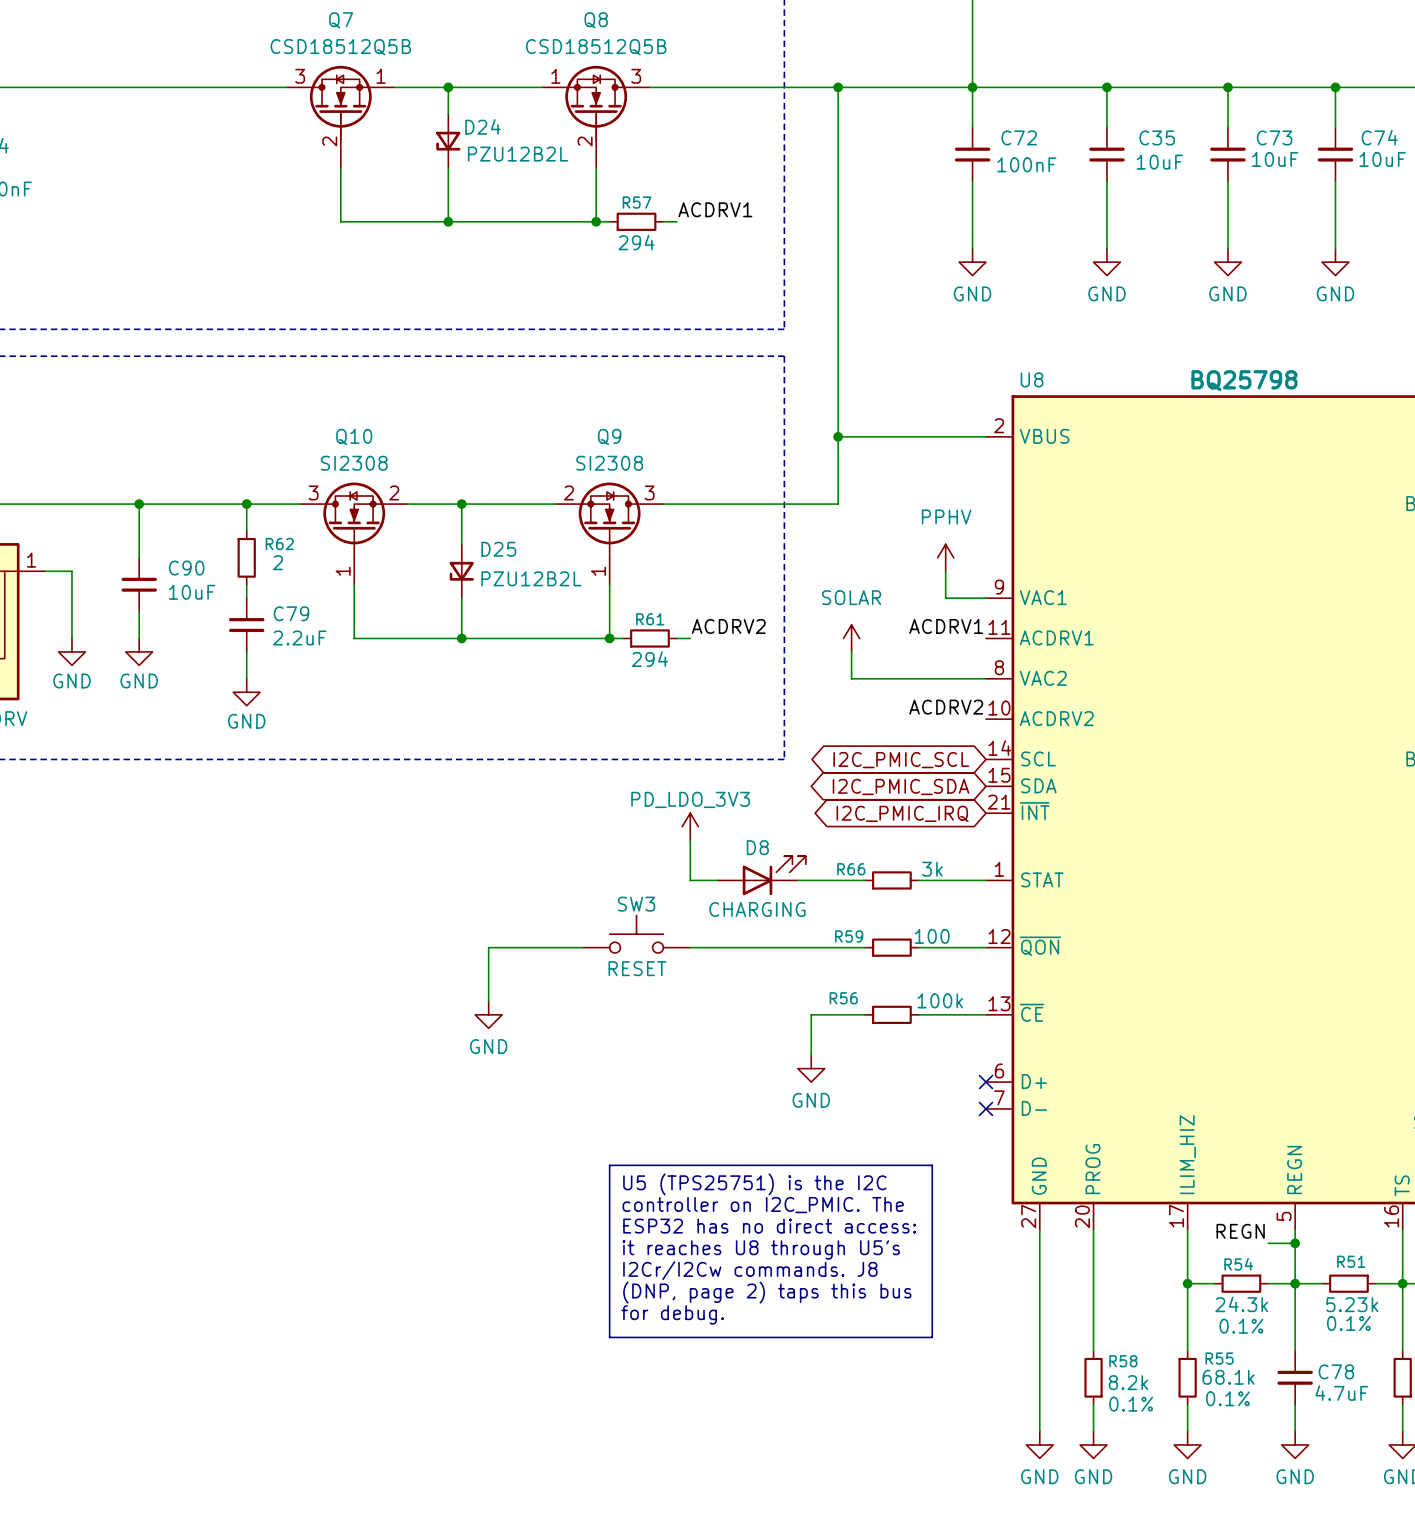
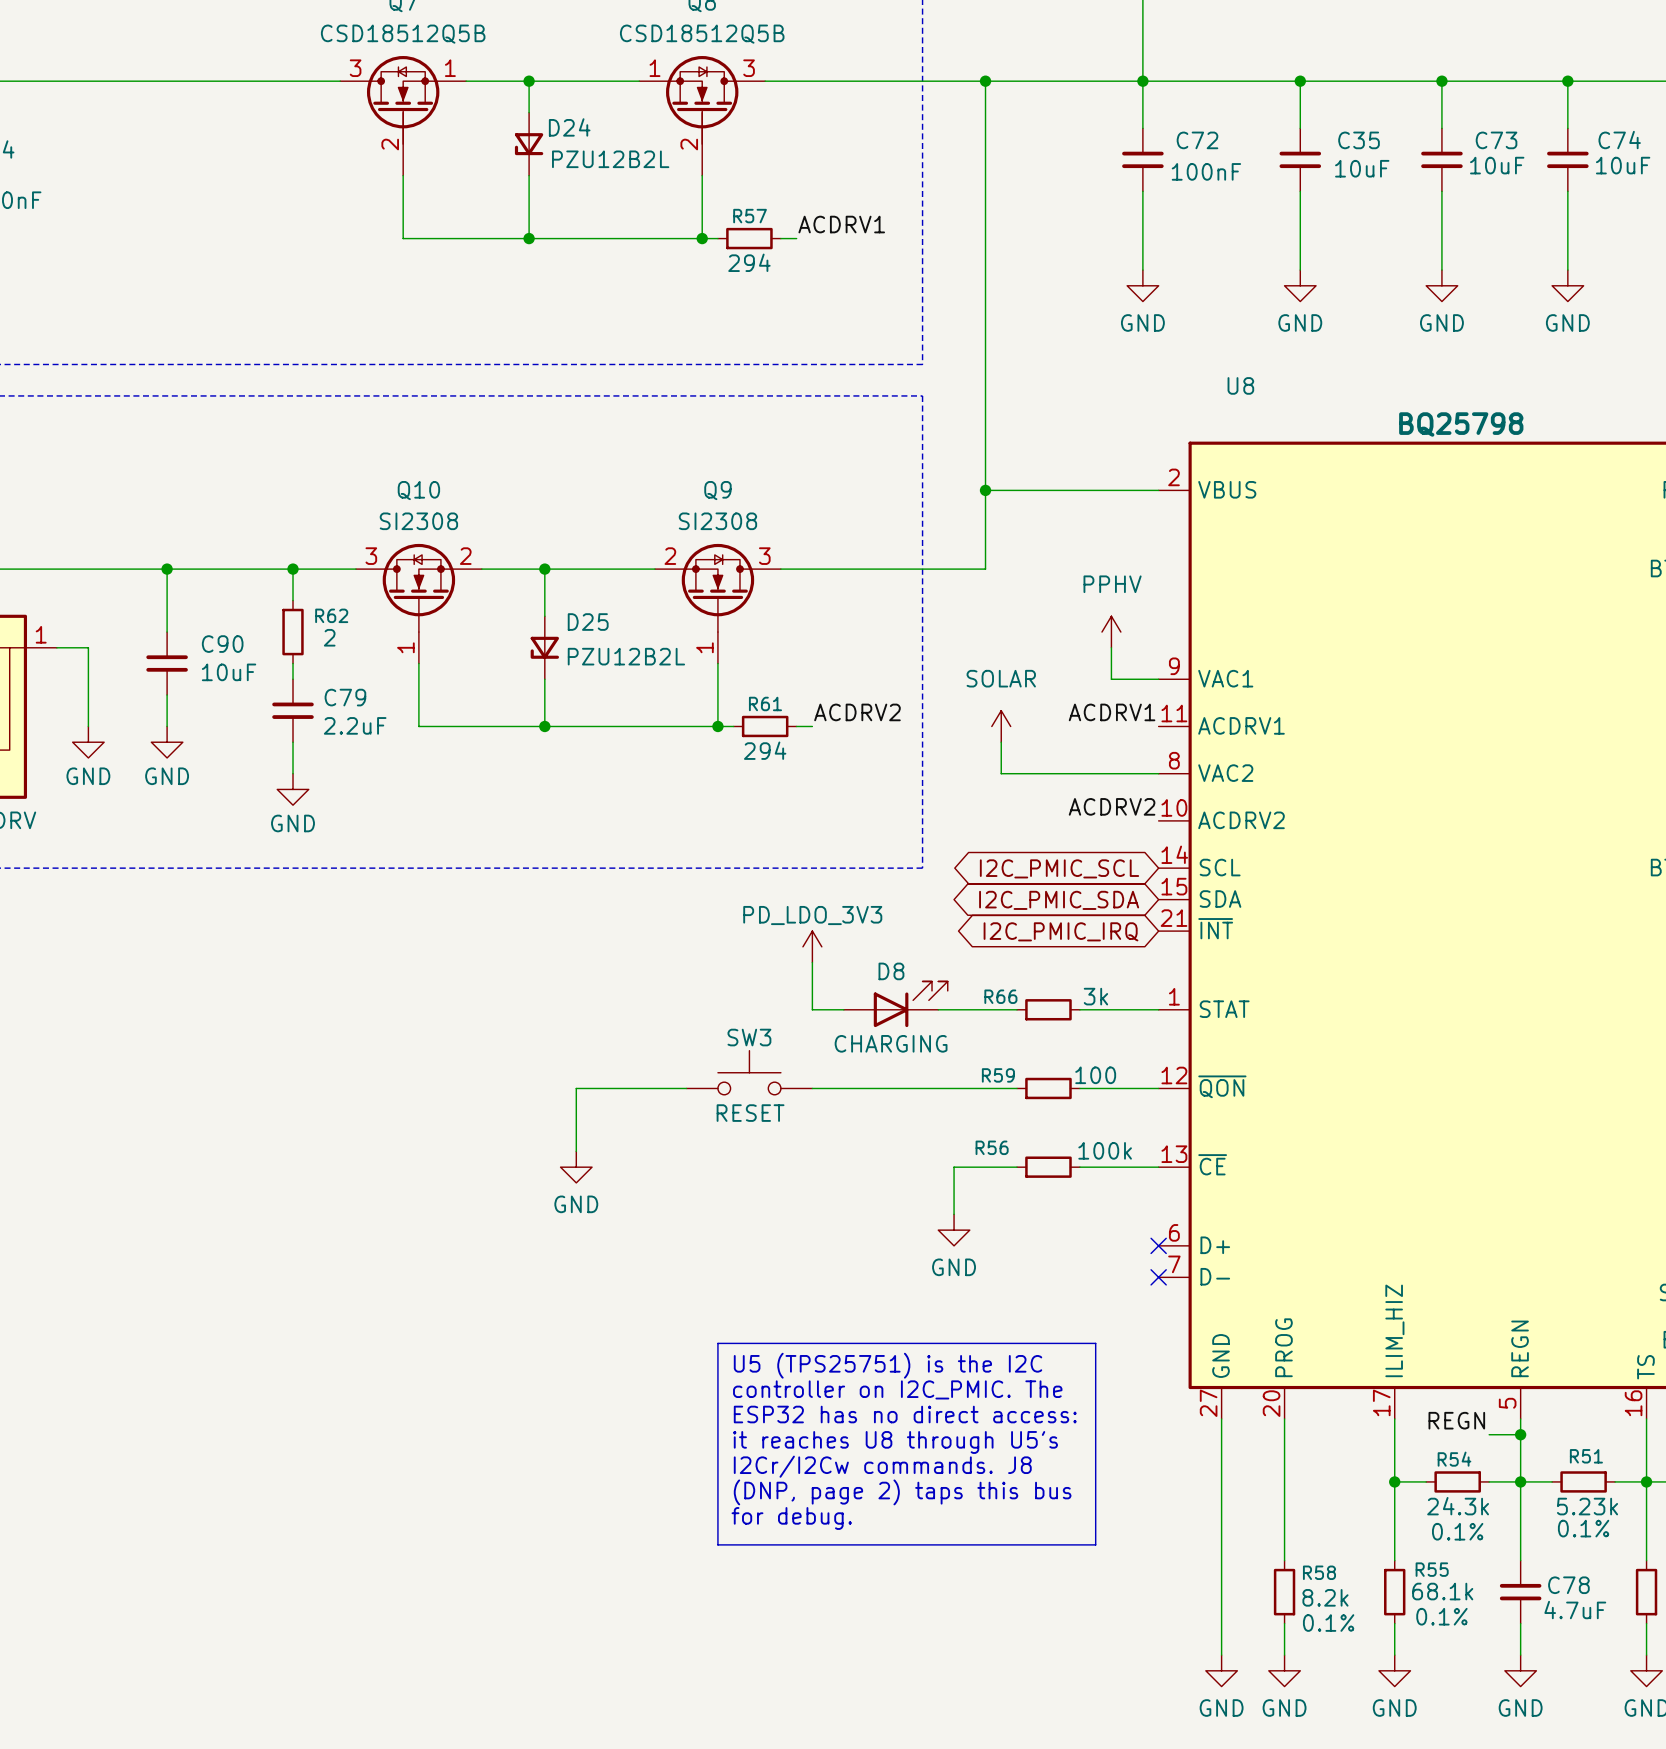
U8 name position: U8 (1032, 379) -> U8 (1240, 385)

